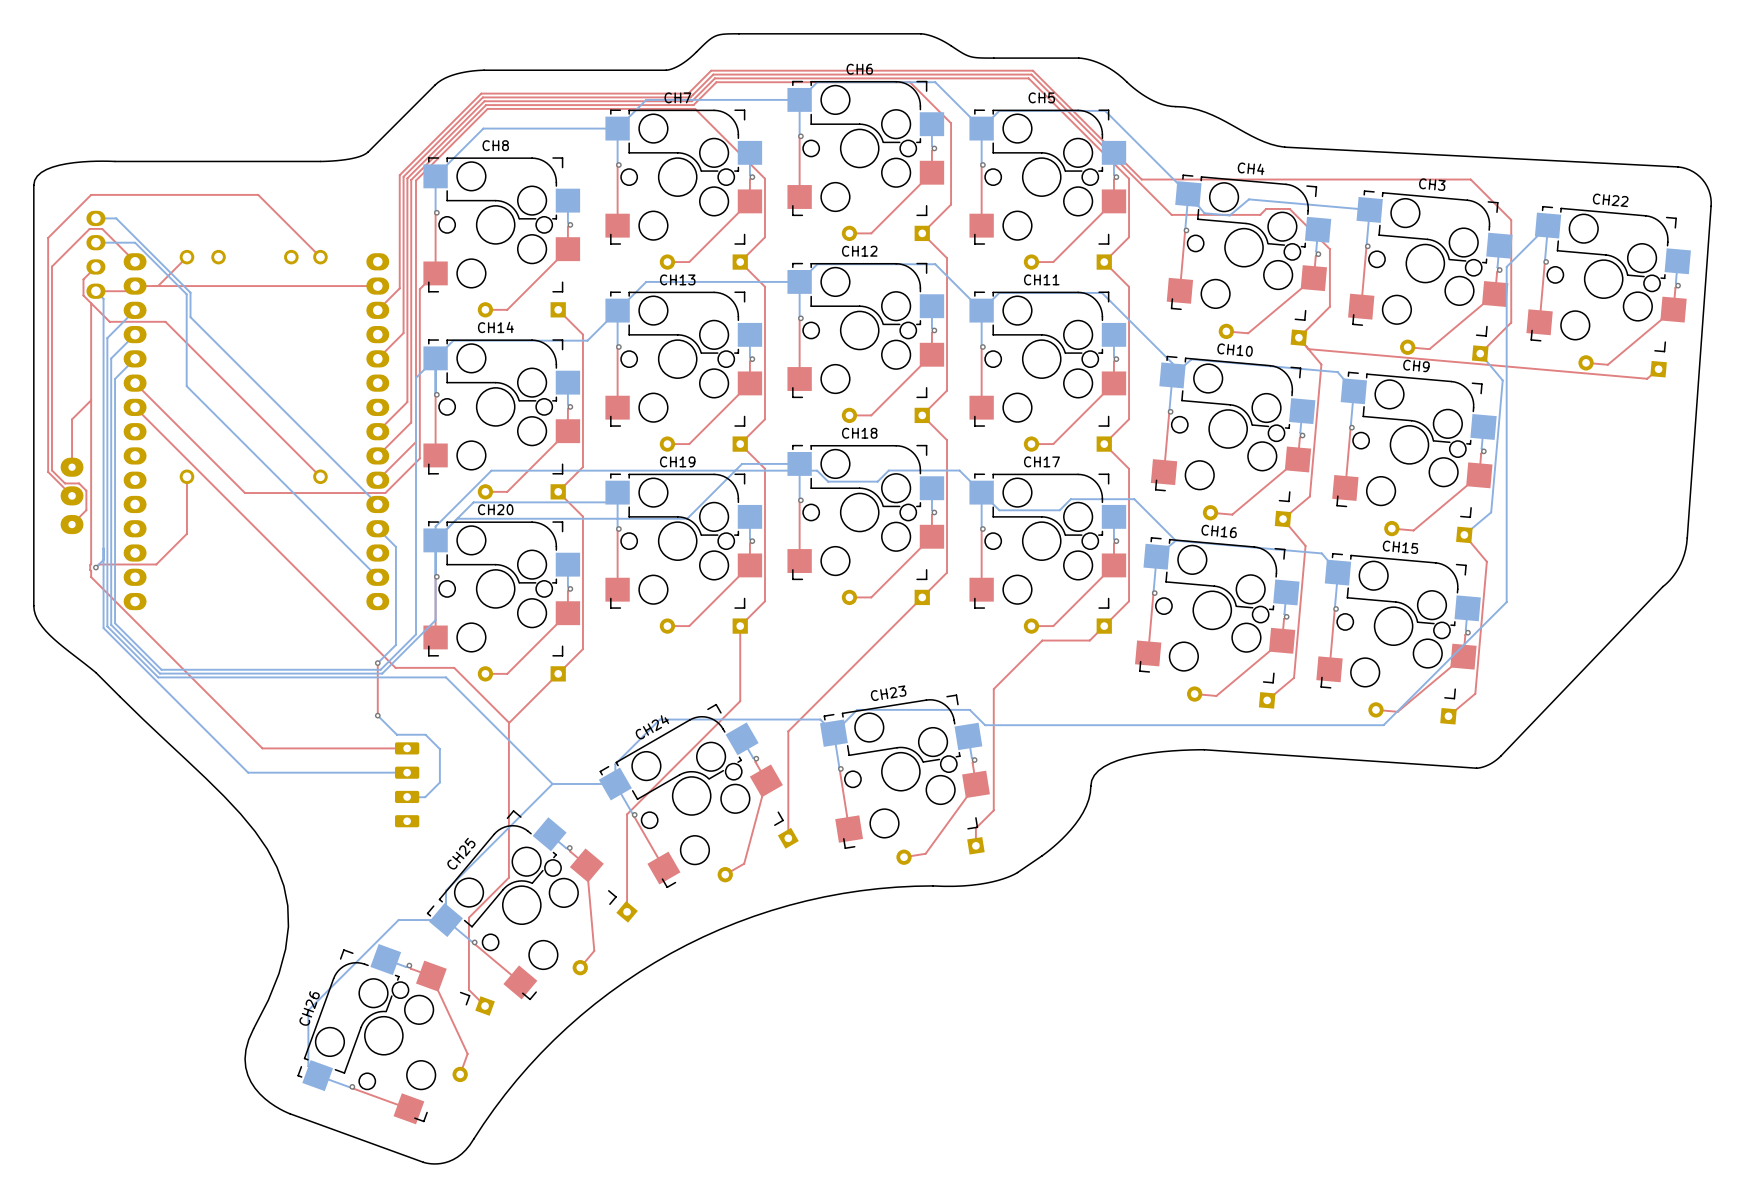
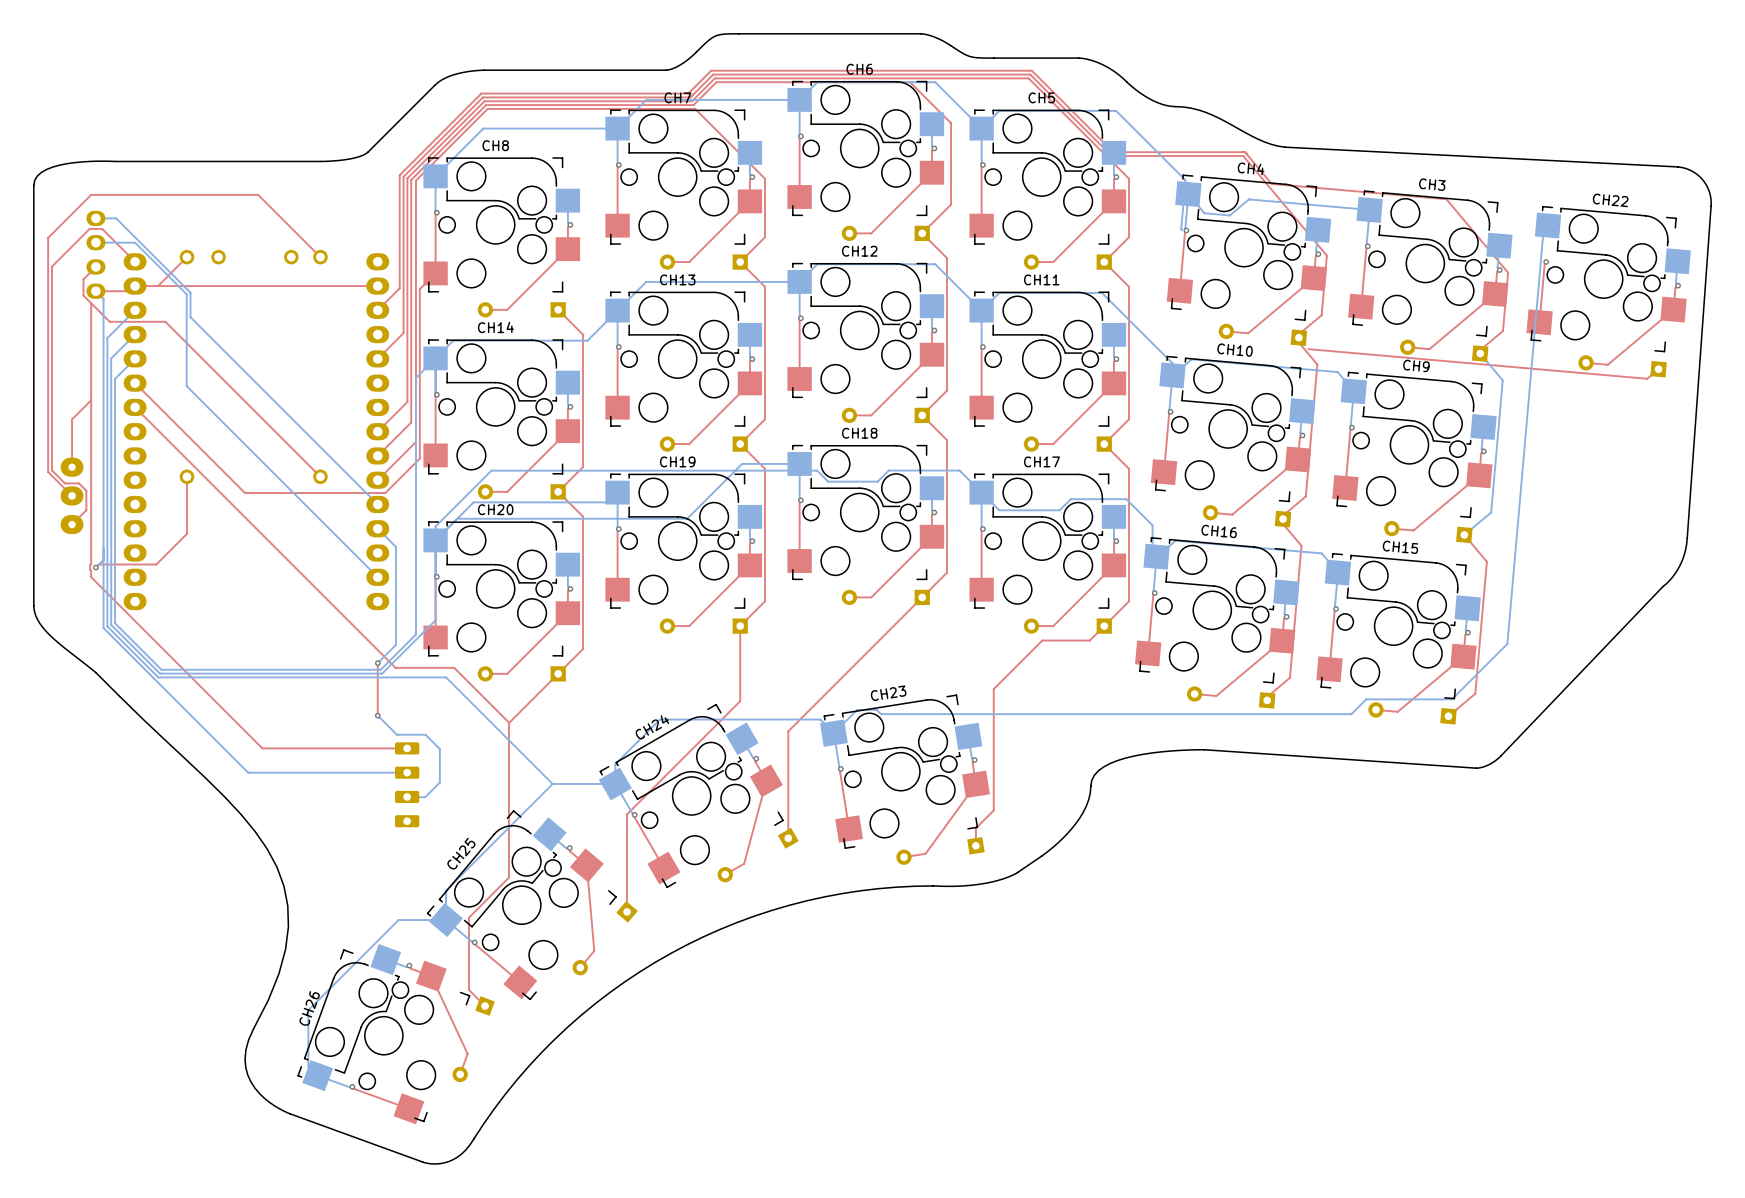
top track: (1031, 70) (1141, 179) (1470, 179) (1511, 220) (1511, 322) (1480, 353) -> (1031, 70) (1113, 152) (1244, 152) (1271, 184)
top track: (1030, 74) (1171, 214) (1260, 214) (1266, 208) (1289, 208) (1329, 249) (1329, 306) (1298, 337) (1321, 364) (1309, 496) (1283, 519) (1305, 545) (1294, 677) (1267, 700) -> (1030, 74) (1111, 156) (1243, 156) (1326, 255) (1321, 315) (1294, 337) (1317, 364) (1305, 496) (1278, 519) (1301, 545) (1289, 677) (1263, 700)
bottom track: (1105, 110) (1188, 194) -> (1105, 110) (1116, 110) (1185, 180) (1182, 230)
top track: none -> (1271, 183) (1446, 199) (1508, 272) (1502, 331) (1476, 353)
bottom track: (1546, 261) (1548, 225) (1506, 266) (1506, 602) (1383, 725) (985, 725) (969, 709) (876, 709) -> (1543, 225) (1507, 643) (1452, 699) (1366, 699) (1351, 714) (880, 714) (876, 709)
bottom track: (1126, 499) (1134, 499) (1175, 540) -> (1126, 499) (1152, 525) (1152, 556)

